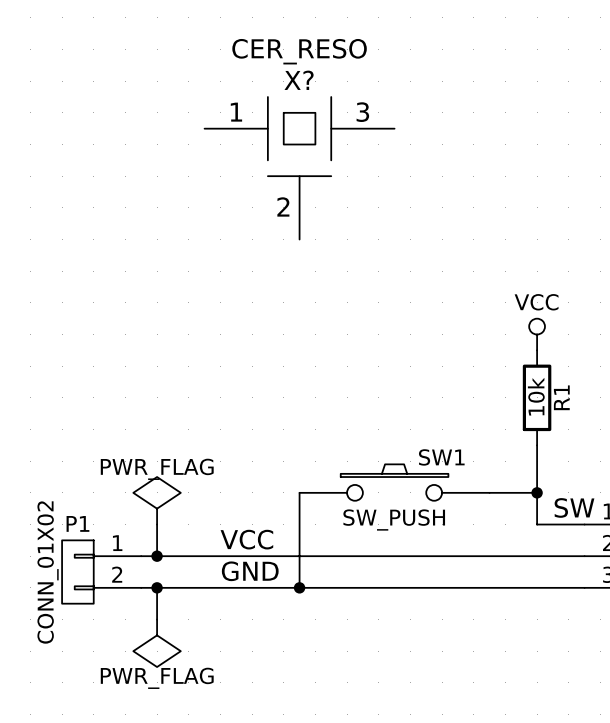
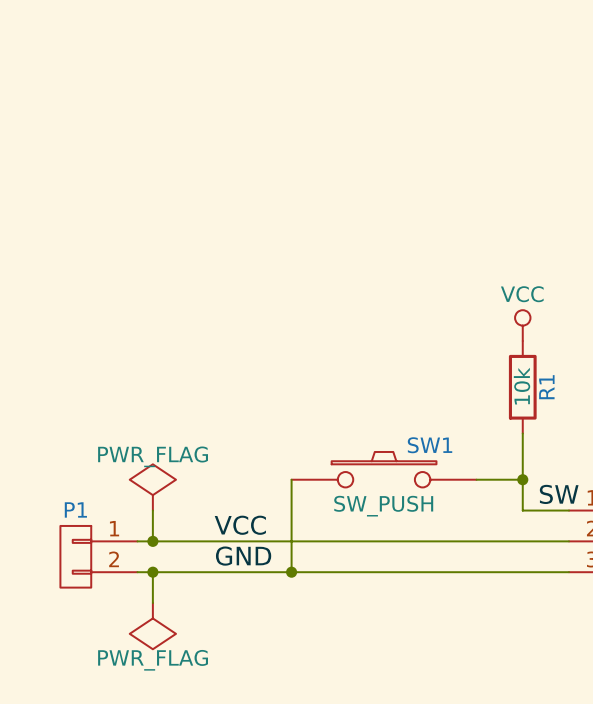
X?: CER_RESO (299, 168) -> none
P1 value: CONN_01X02 (48, 572) -> none

